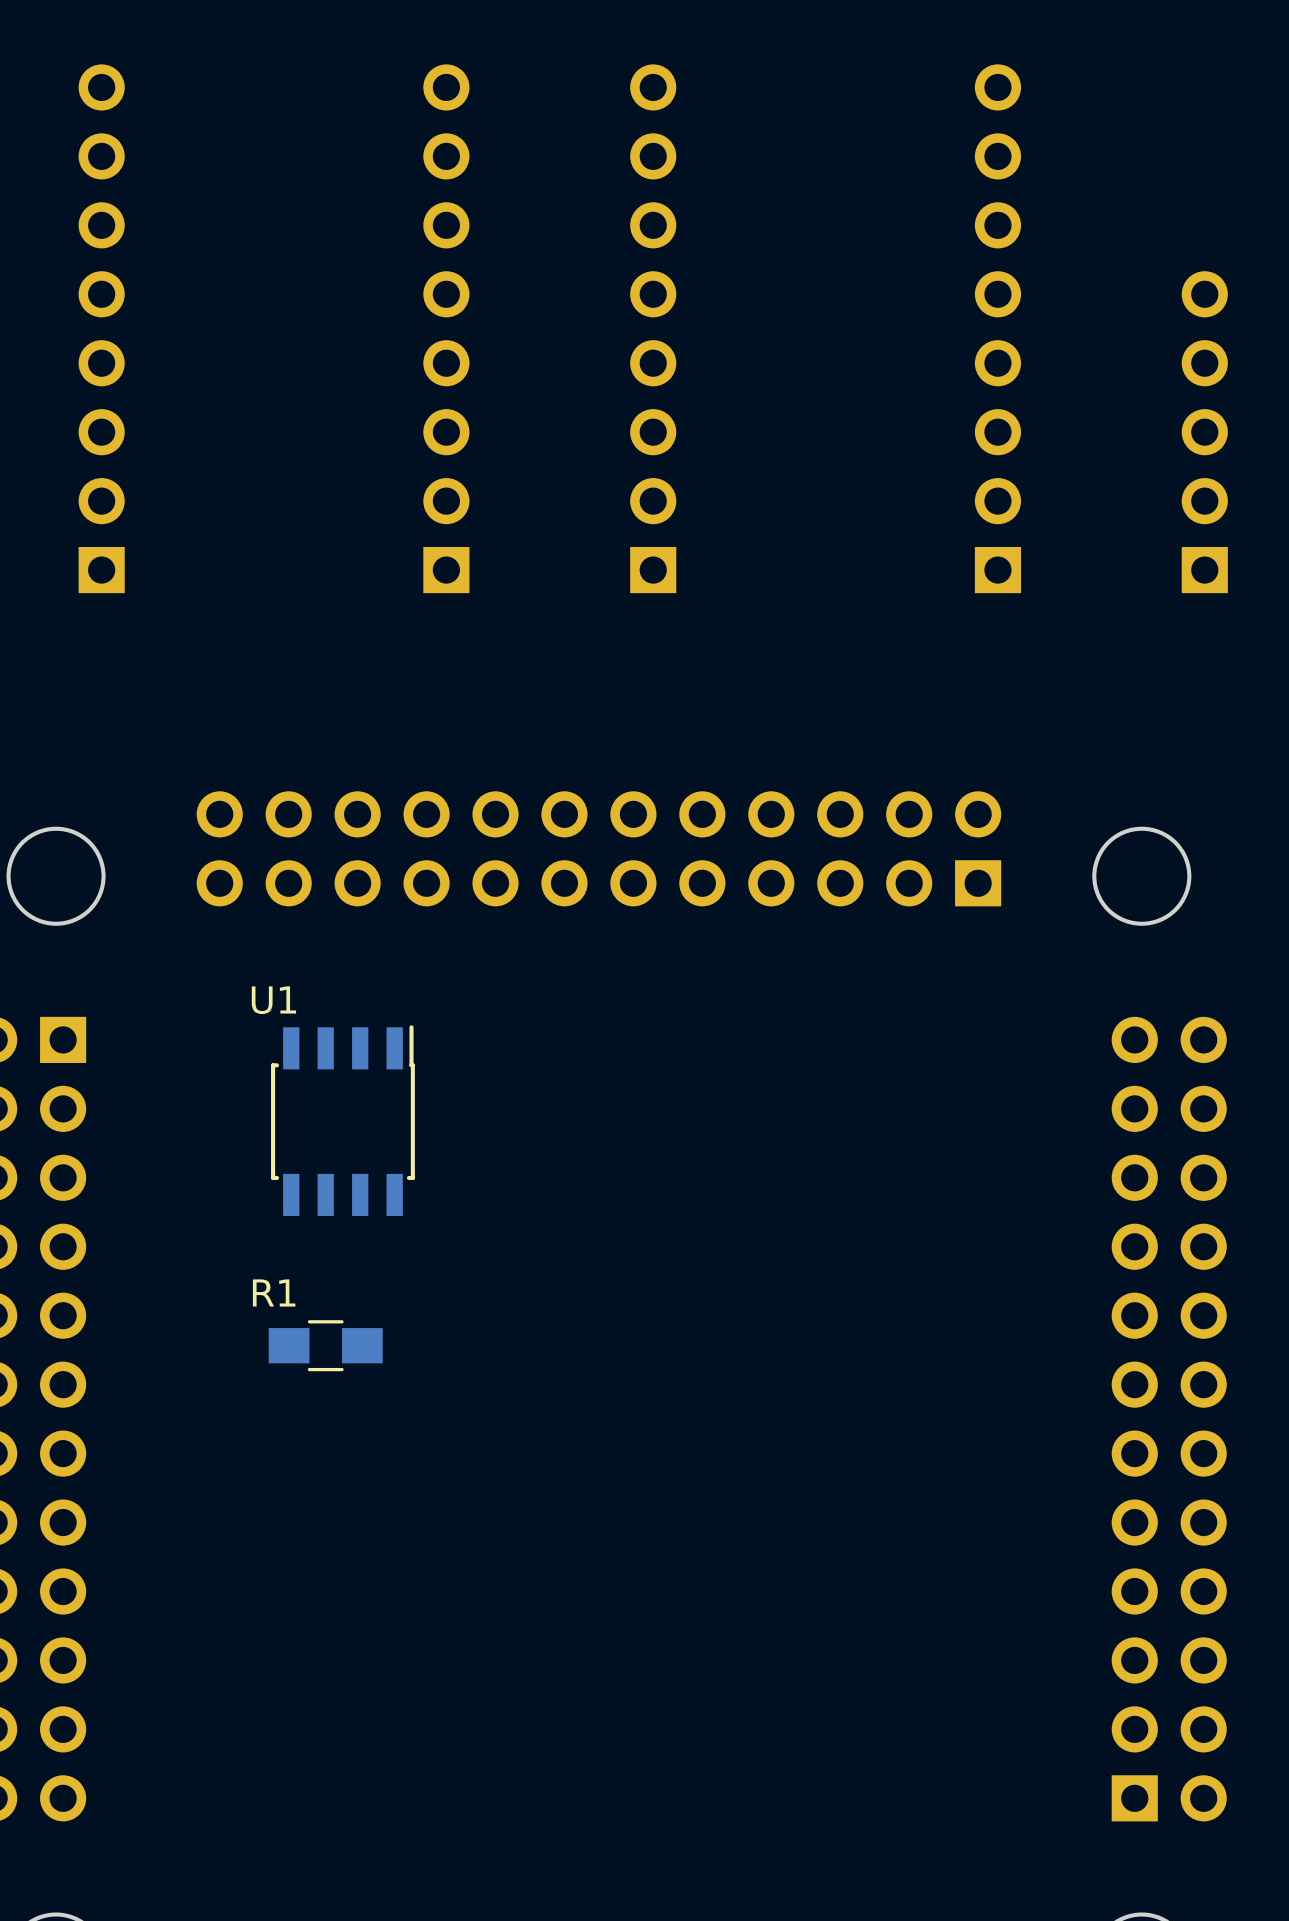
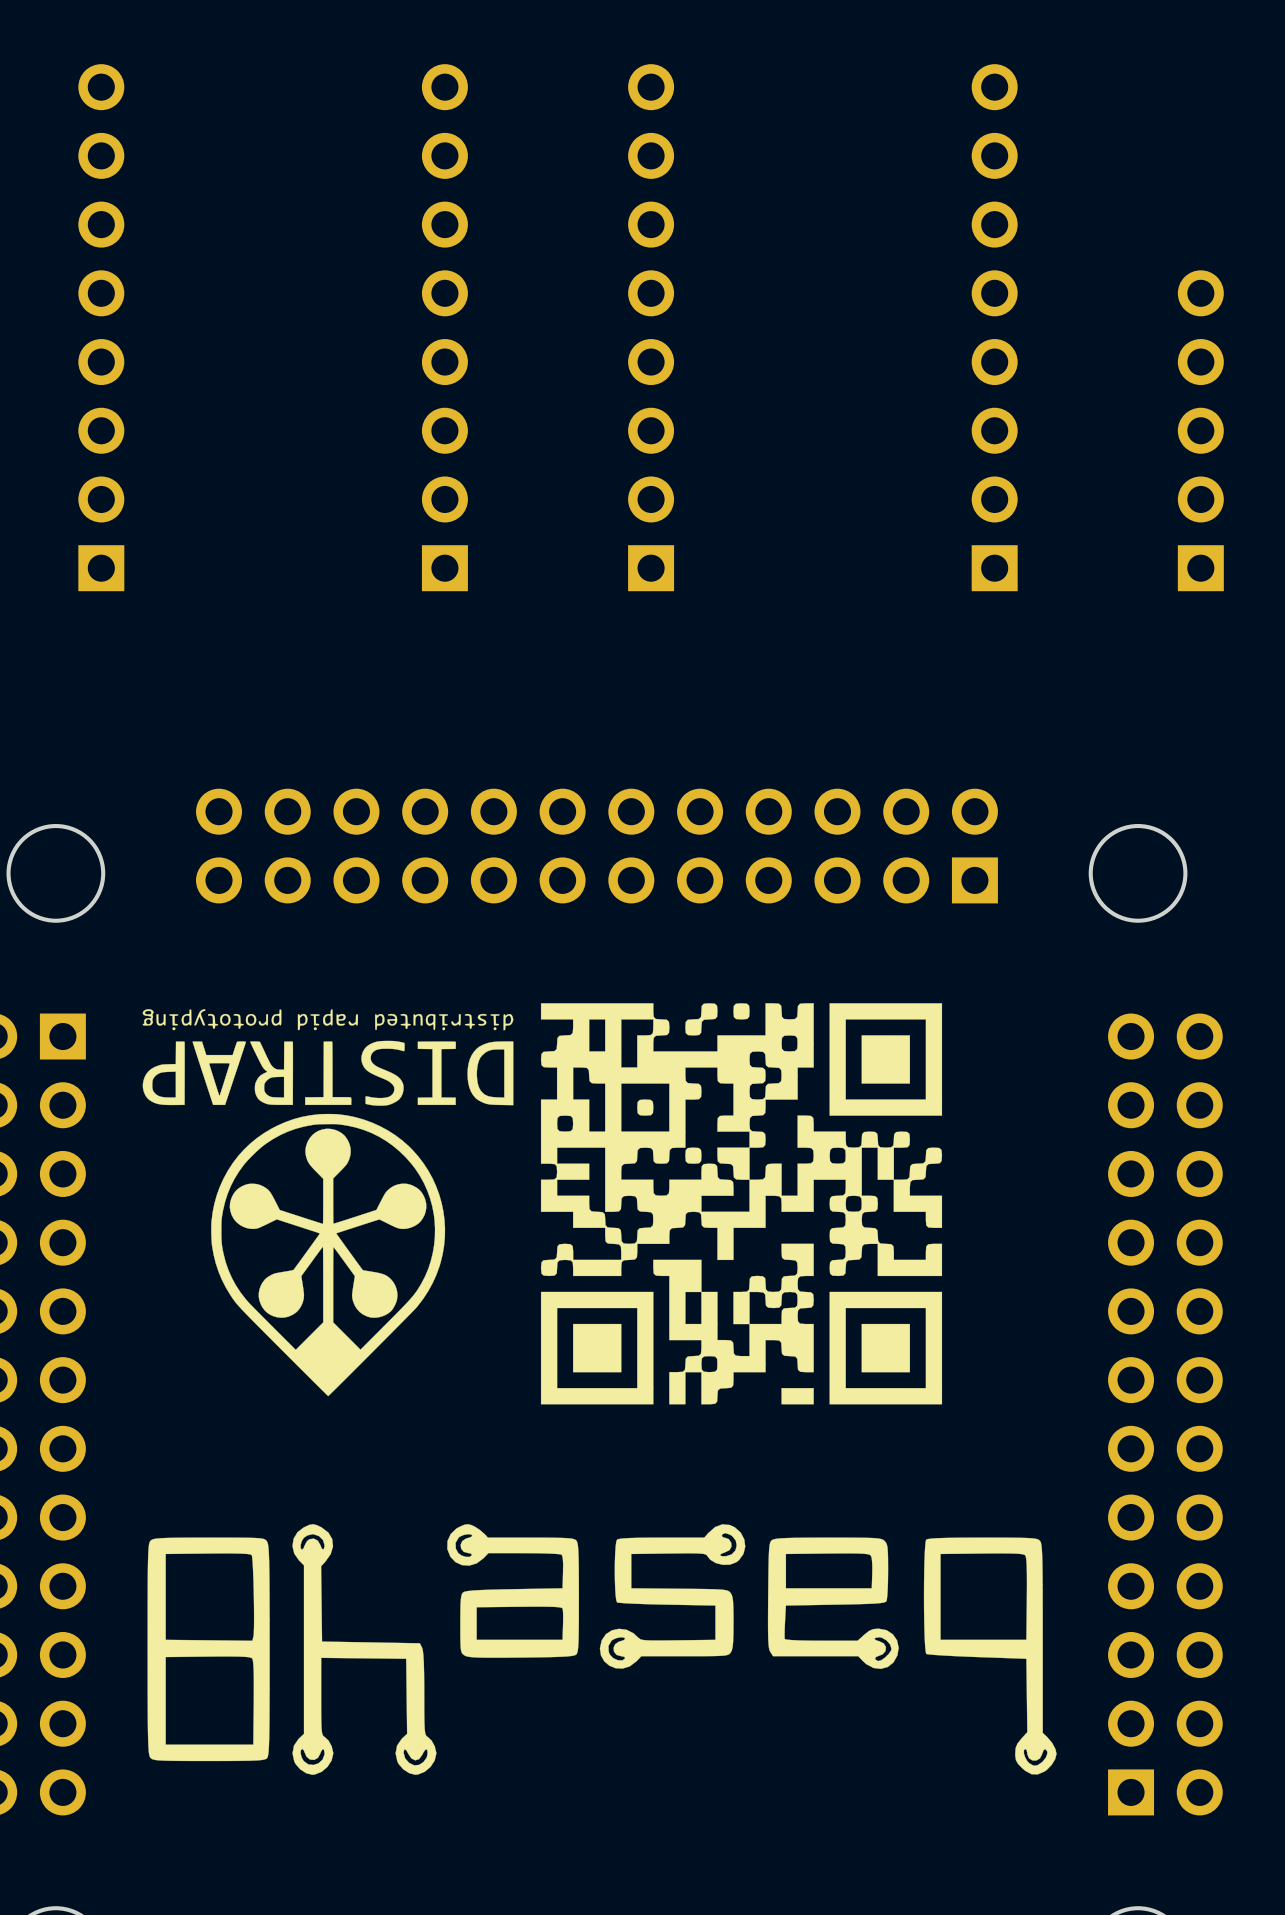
drawing: none -> [142, 1003, 943, 1405]
U1: (342, 1120) -> none
R1: (325, 1345) -> none
drawing: none -> [147, 1524, 1057, 1775]

